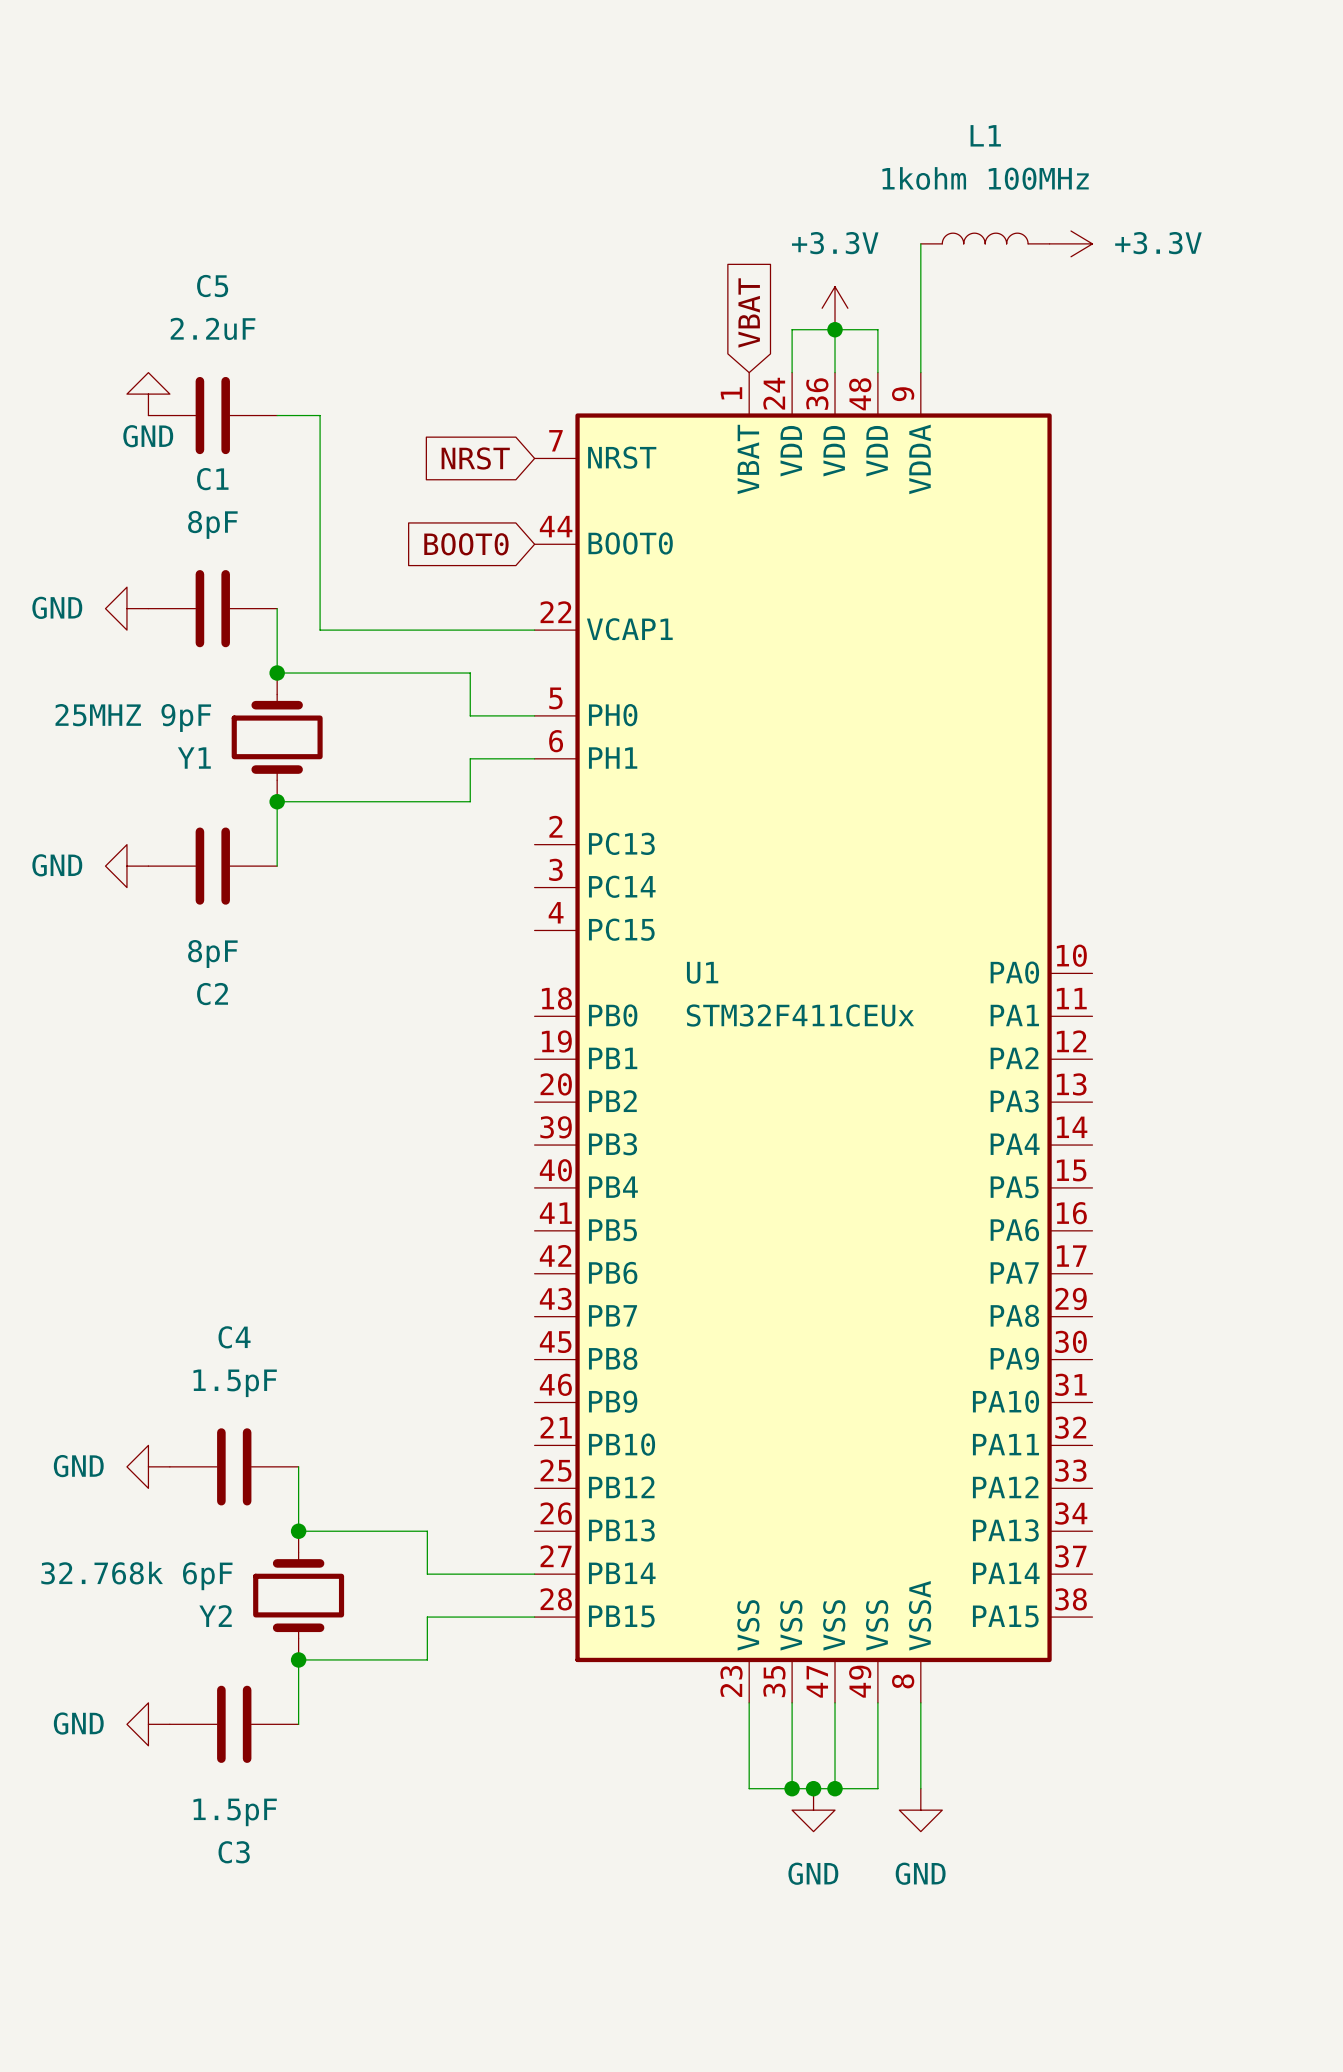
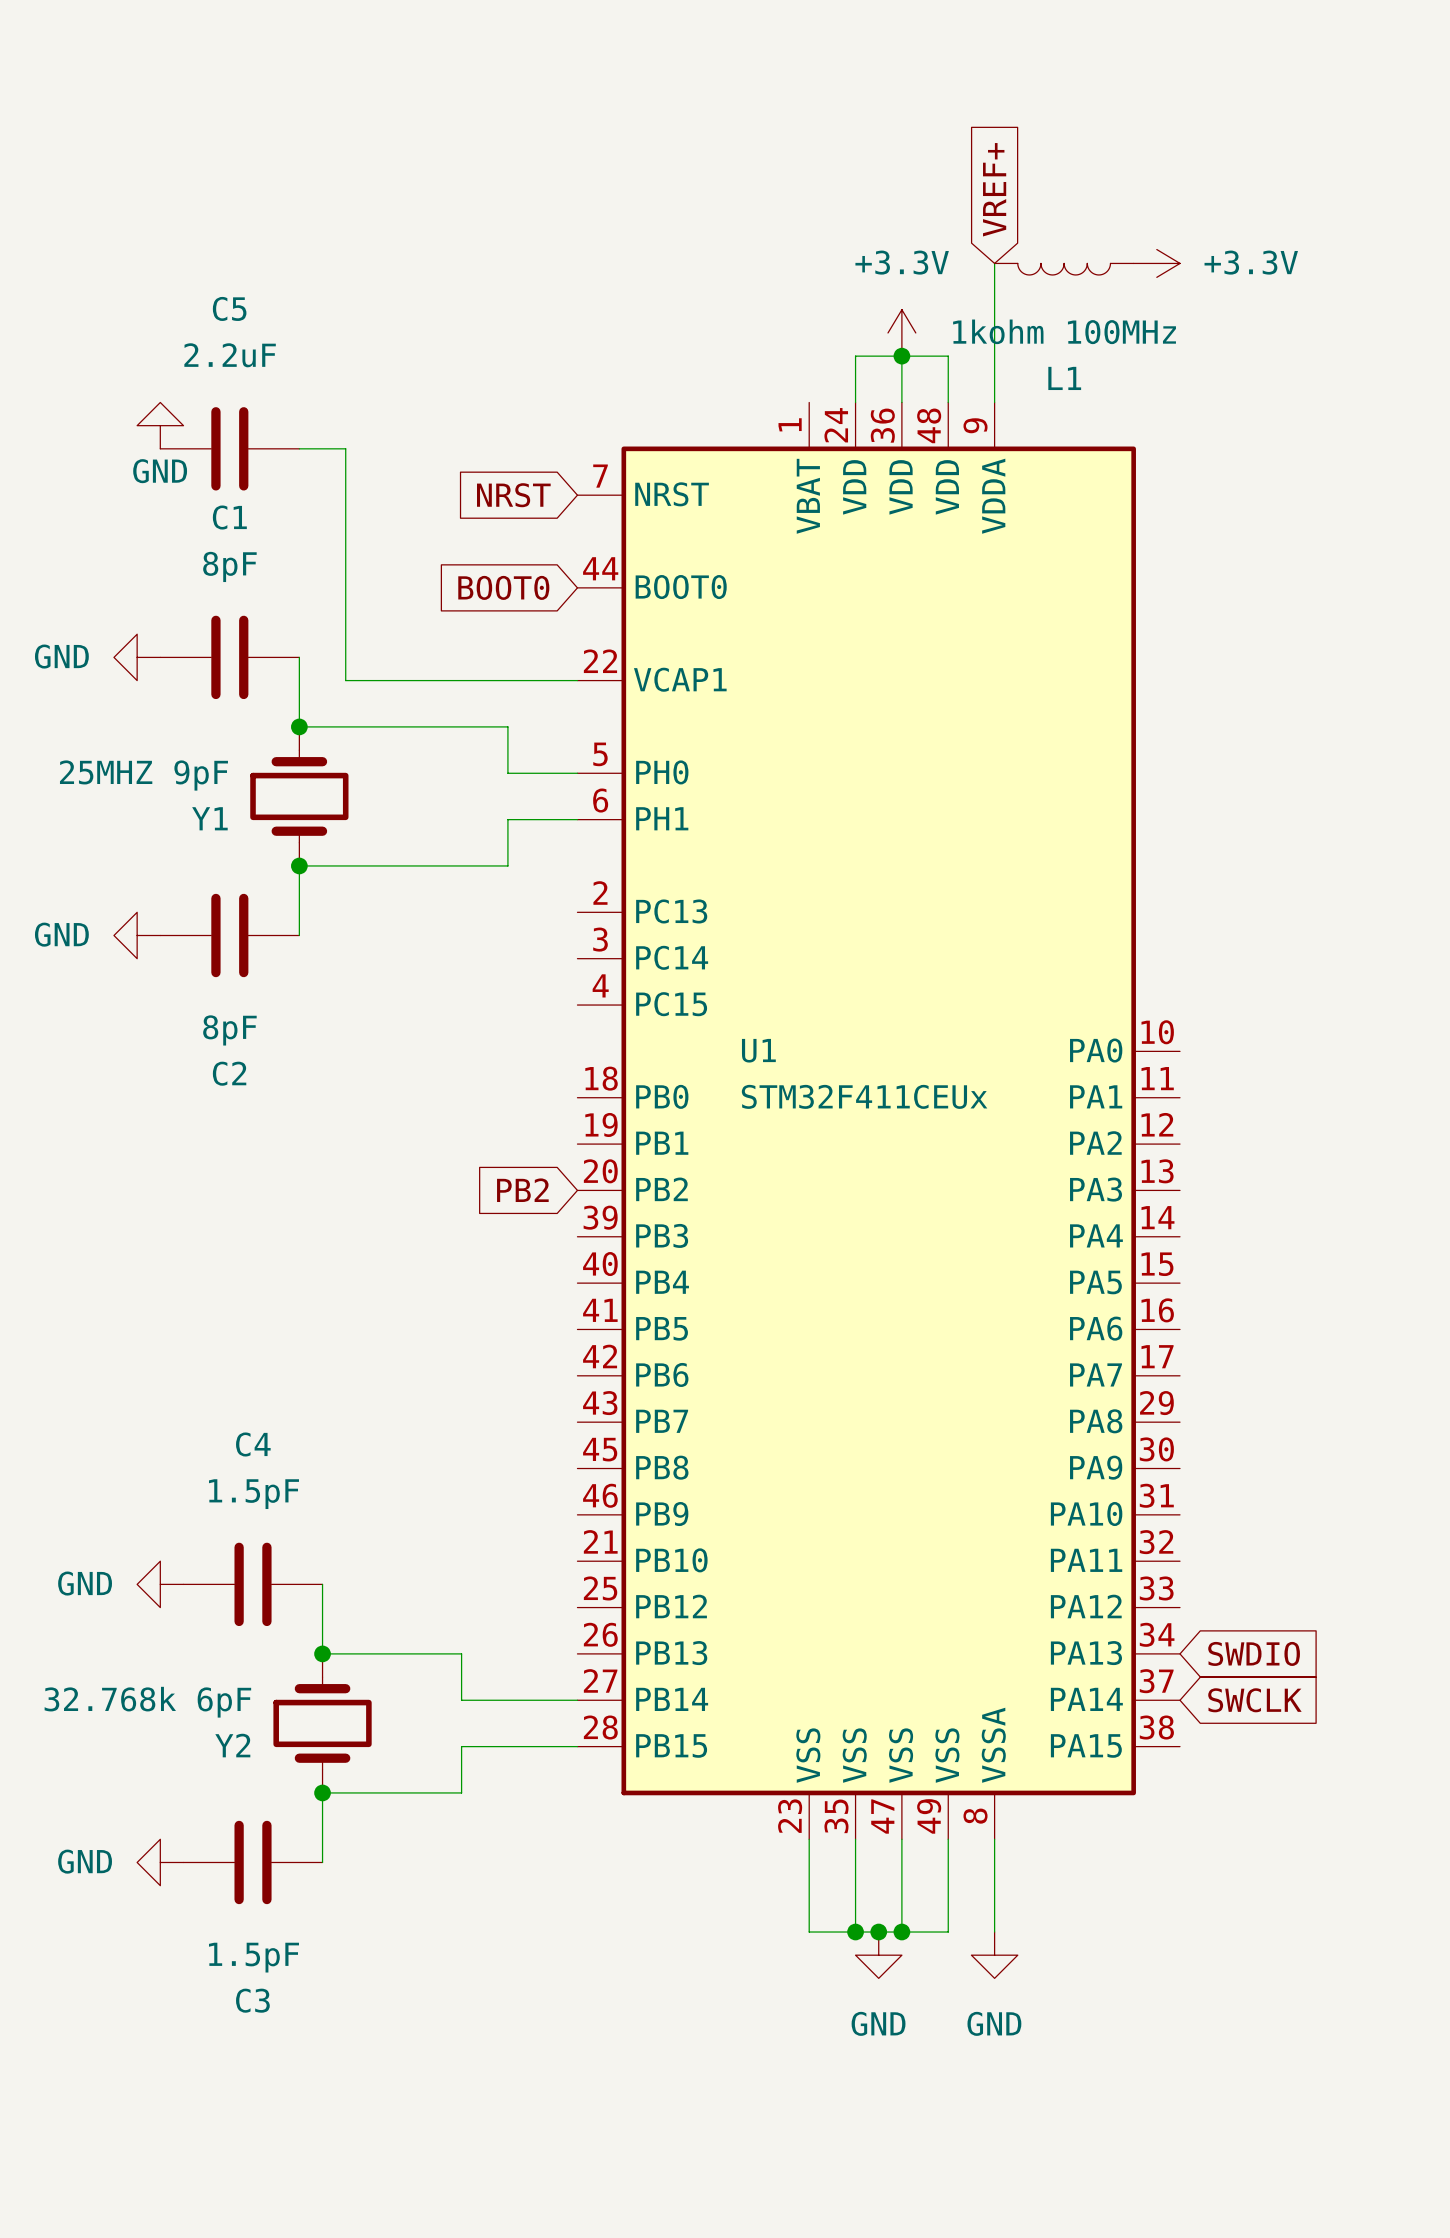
L1 name position: L1 (985, 135) -> L1 (1064, 378)
global label: none -> VREF+ (994, 189)
L1 value position: 1kohm 100MHz (985, 178) -> 1kohm 100MHz (1064, 331)
L1 symbol: [920, 233, 1050, 244] -> [994, 263, 1134, 275]
global label: VBAT (749, 312) -> none
global label: none -> PB2 (522, 1190)
global label: none -> SWDIO (1254, 1653)
global label: none -> SWCLK (1254, 1700)

